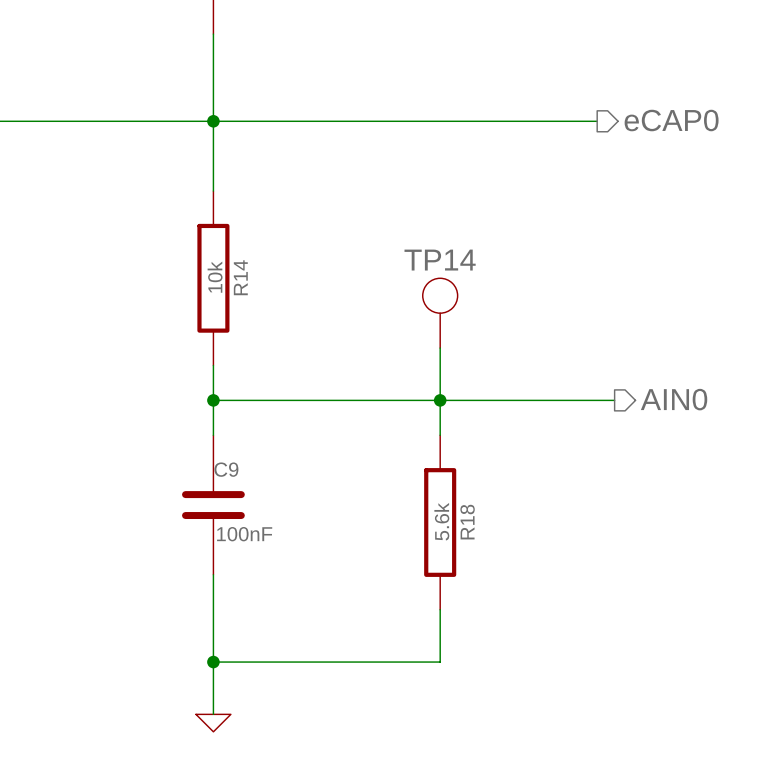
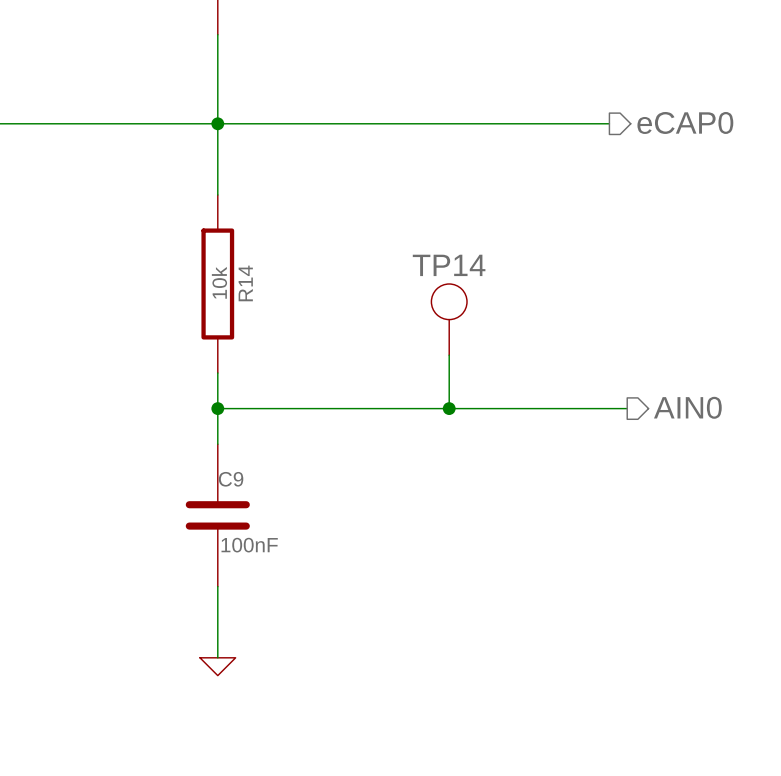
wire: (440, 400) (440, 435) -> none
R18: 5.6k (440, 522) -> none
wire: (440, 609) (440, 662) (213, 662) -> none
wire: (213, 644) (213, 714) -> none
junction: (213, 662) -> none
power symbol position: (213, 723) -> (217, 666)

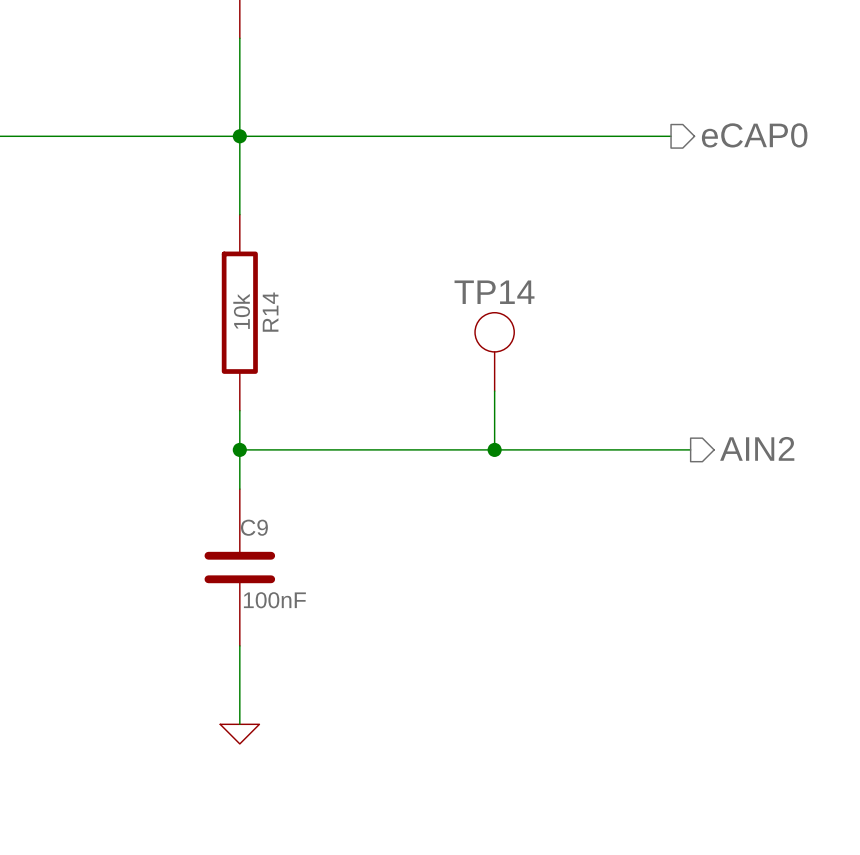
hierarchical label: AIN0 (687, 407) -> AIN2 (757, 448)

